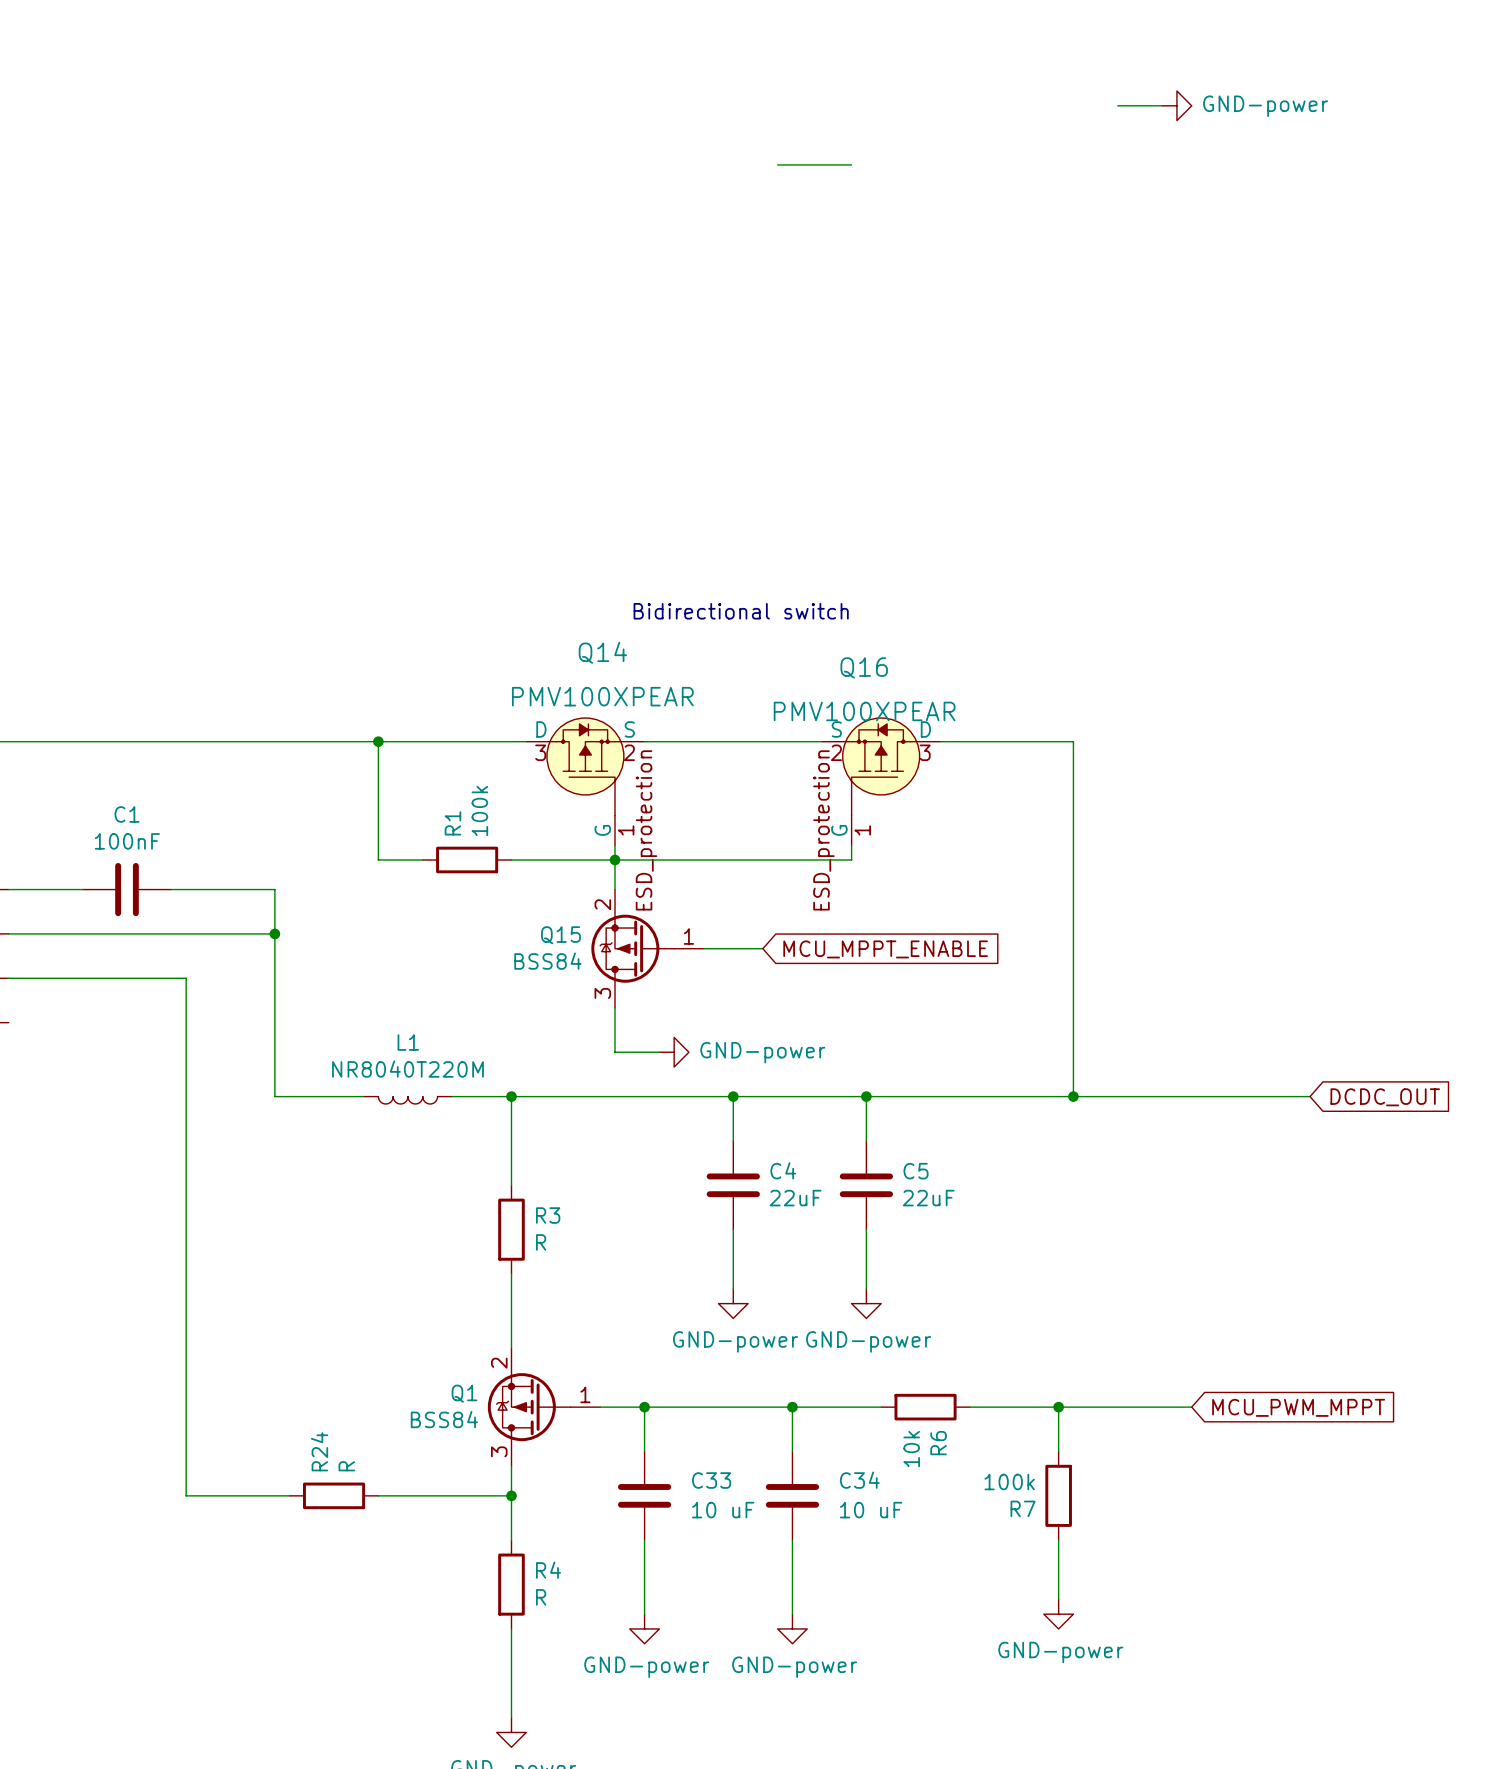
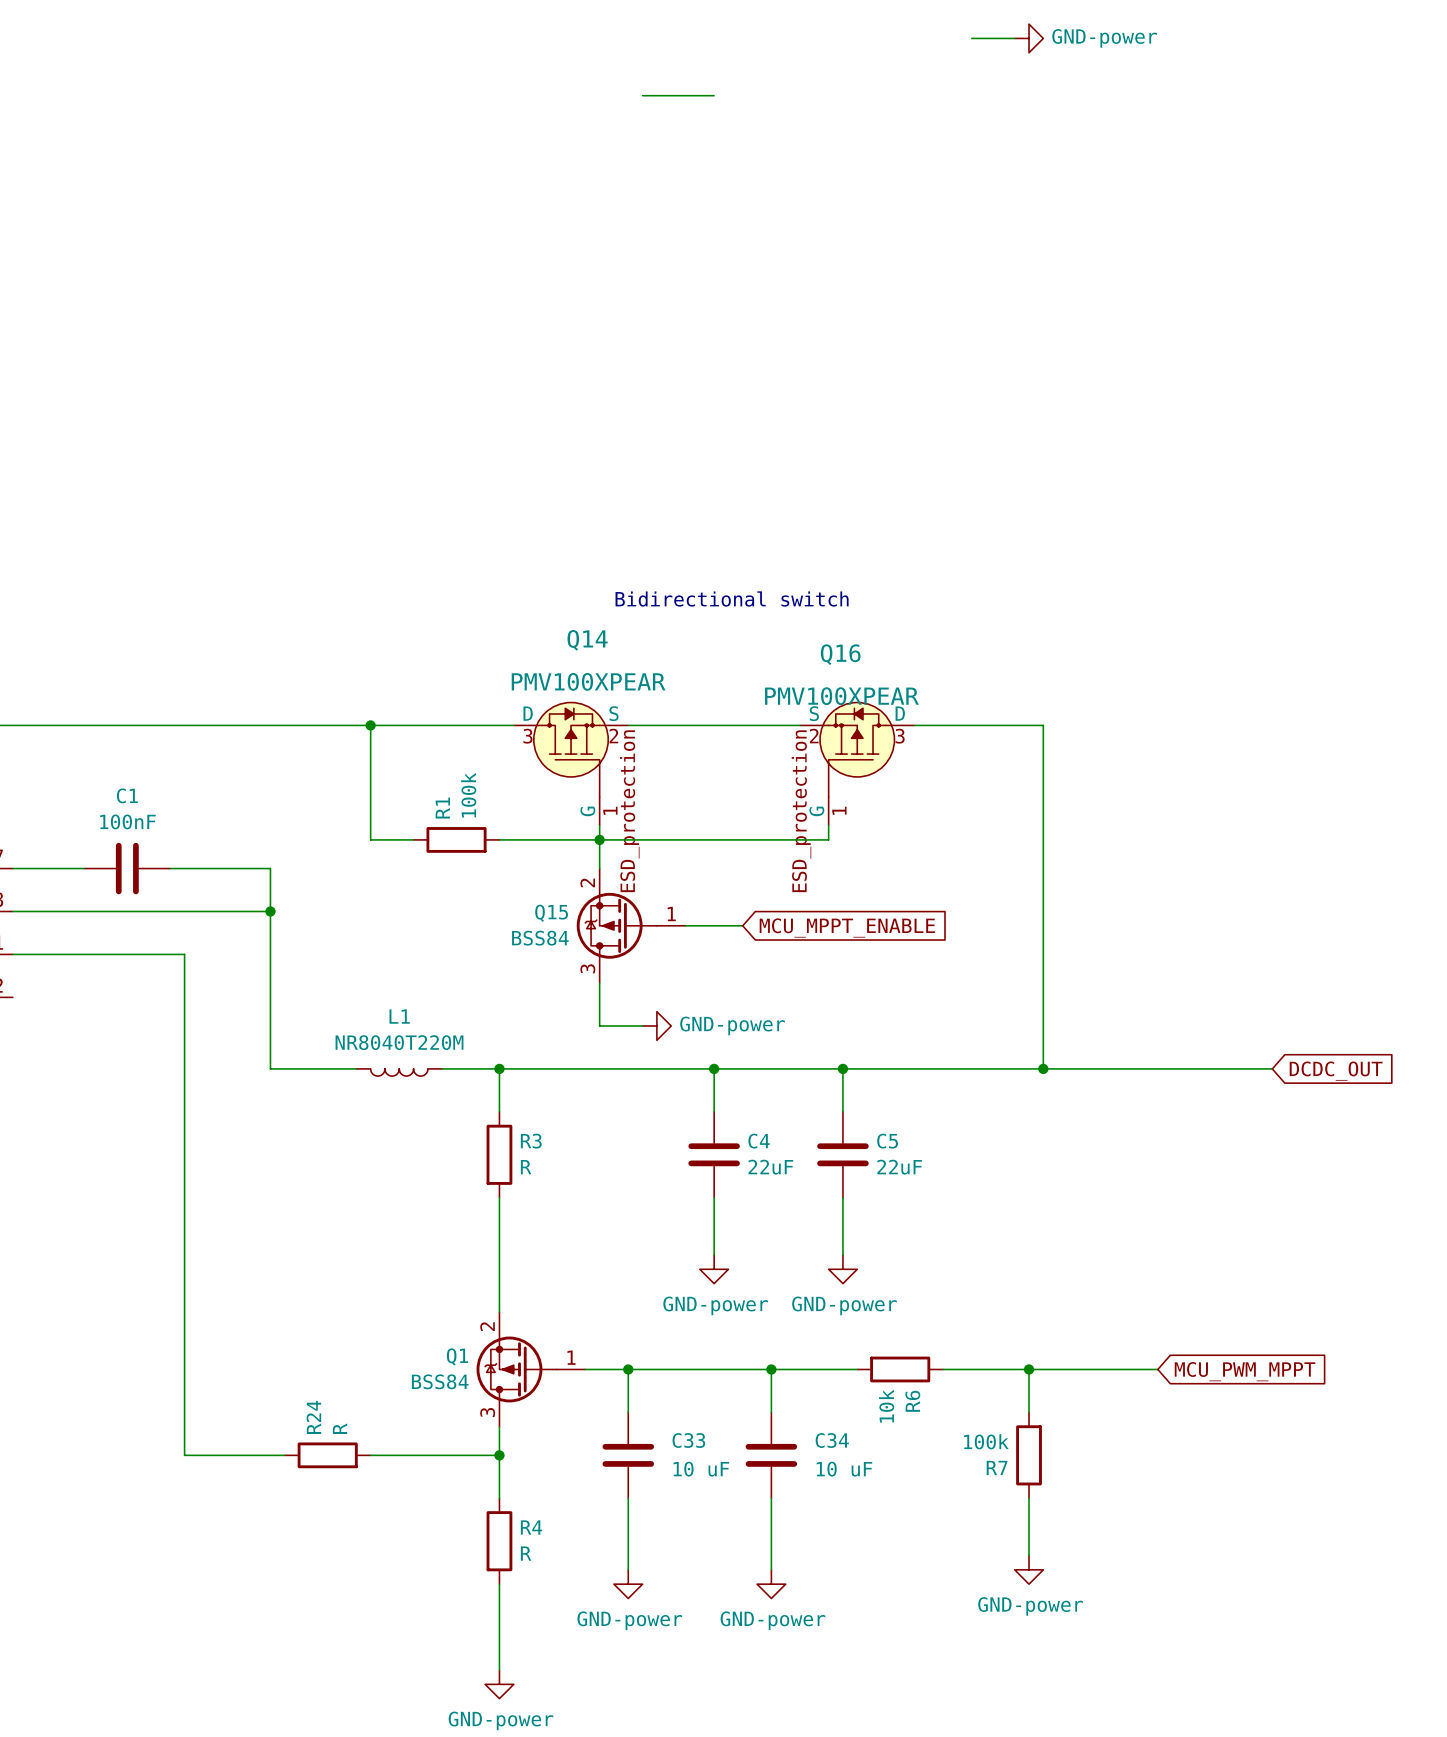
wire: (1117, 105) (1162, 105) -> (971, 38) (1014, 38)
power symbol position: GND-power (1176, 105) -> GND-power (1029, 38)
wire: (777, 164) (851, 164) -> (642, 95) (714, 95)
wire: (511, 1140) (511, 1185) -> (499, 1197) (499, 1240)
R3 position: (511, 1229) -> (499, 1154)

